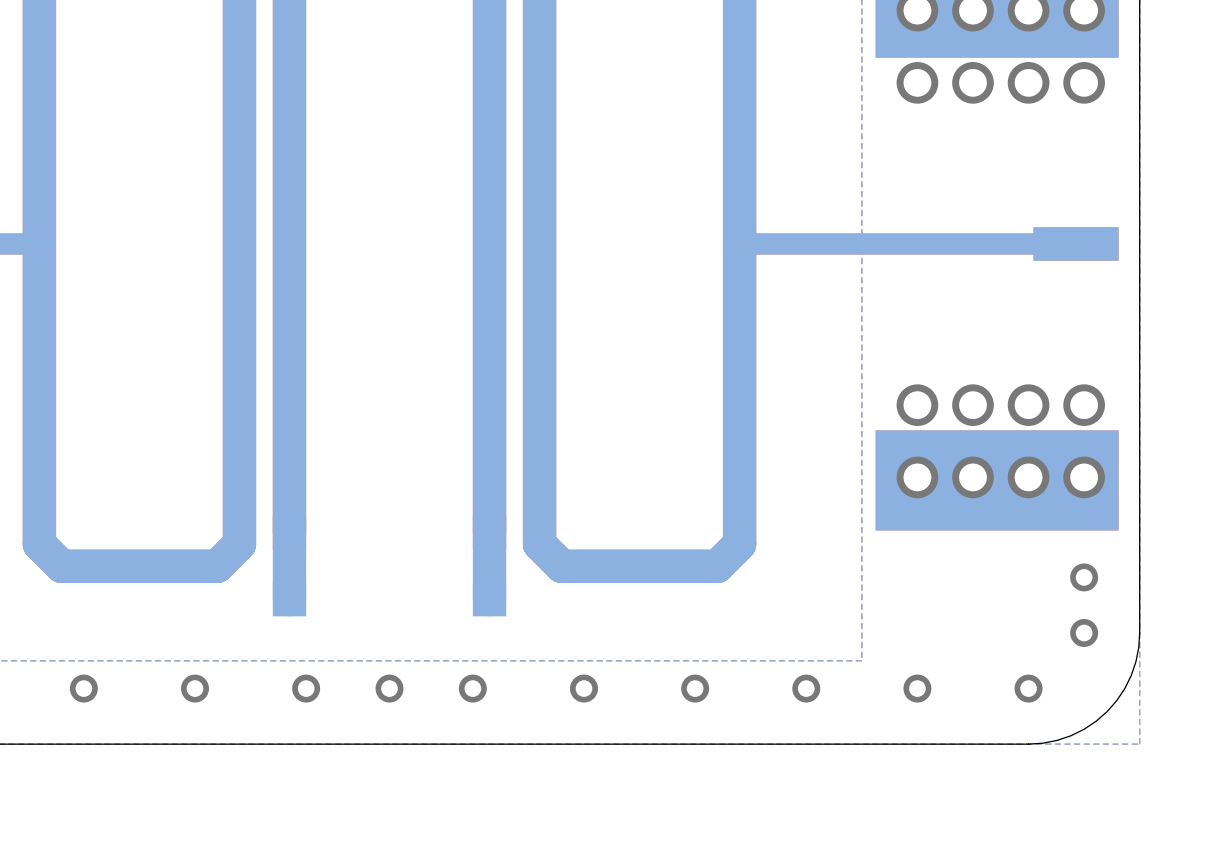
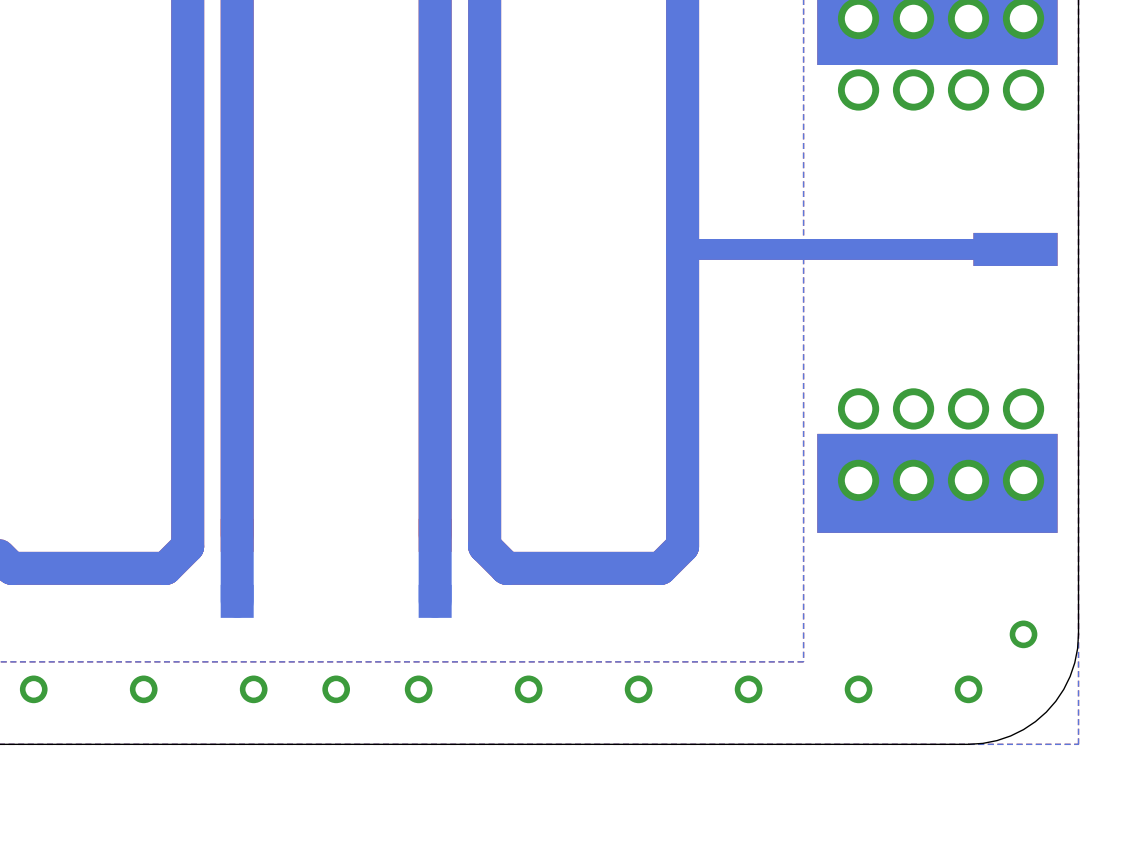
via: (1084, 577) -> none

